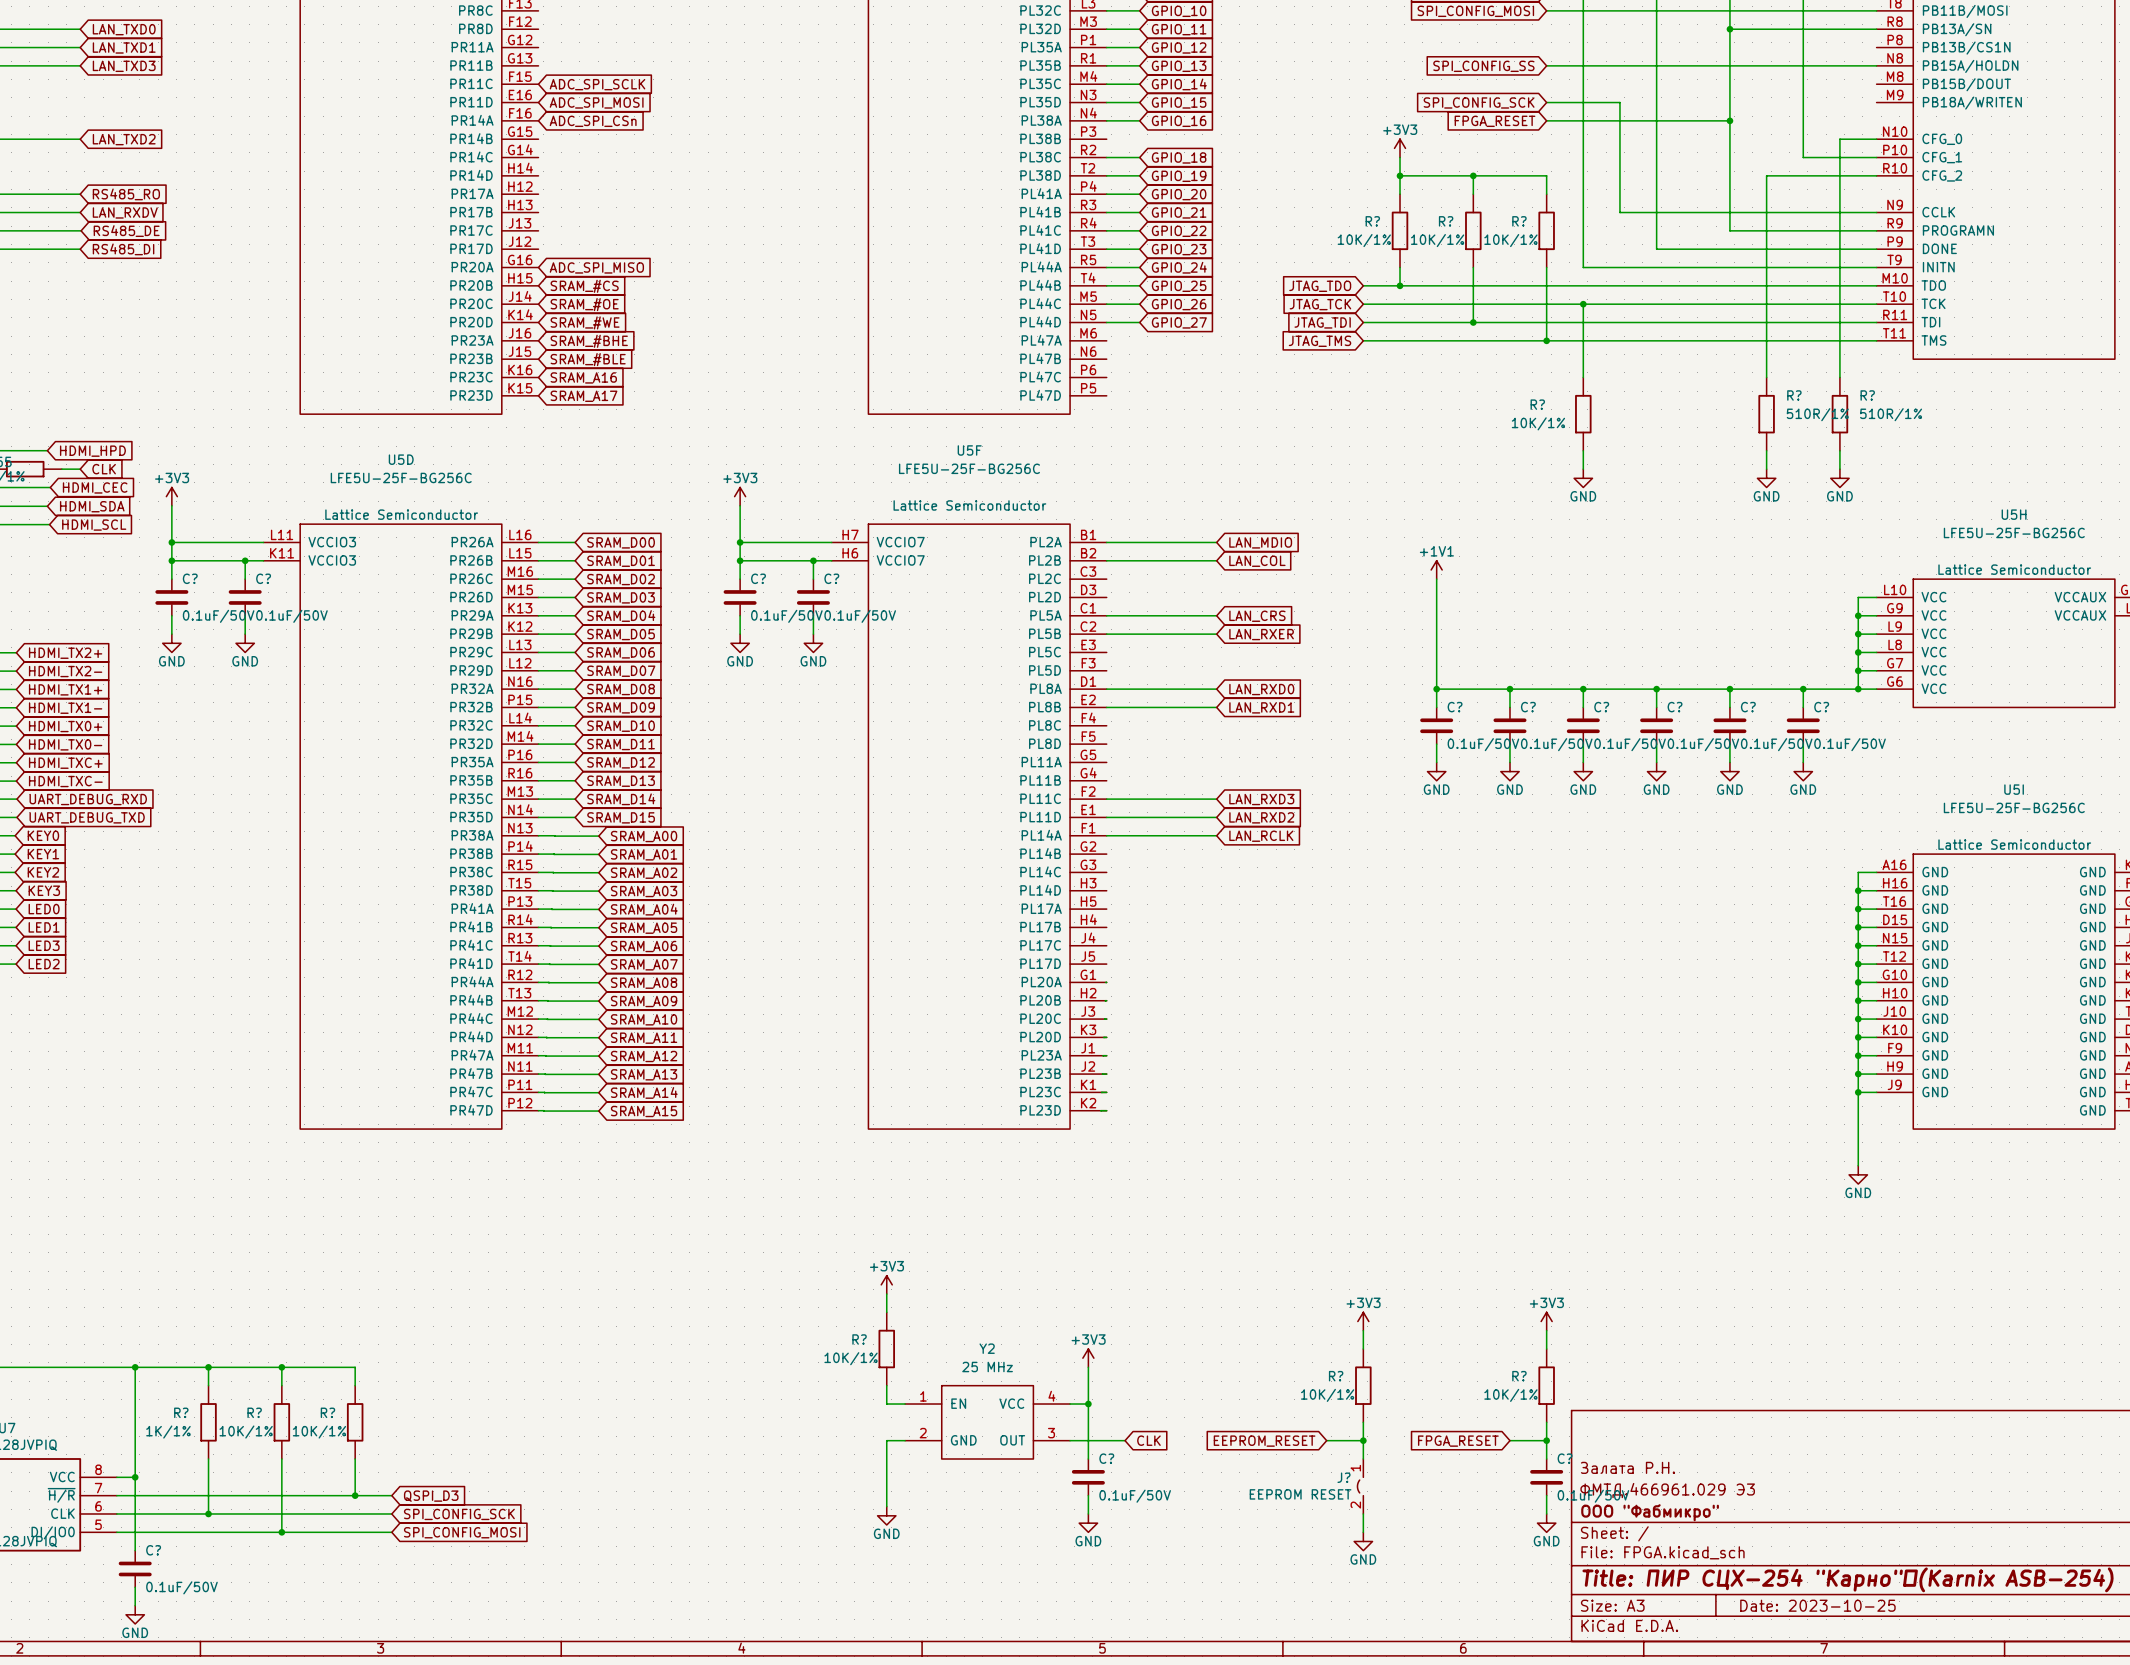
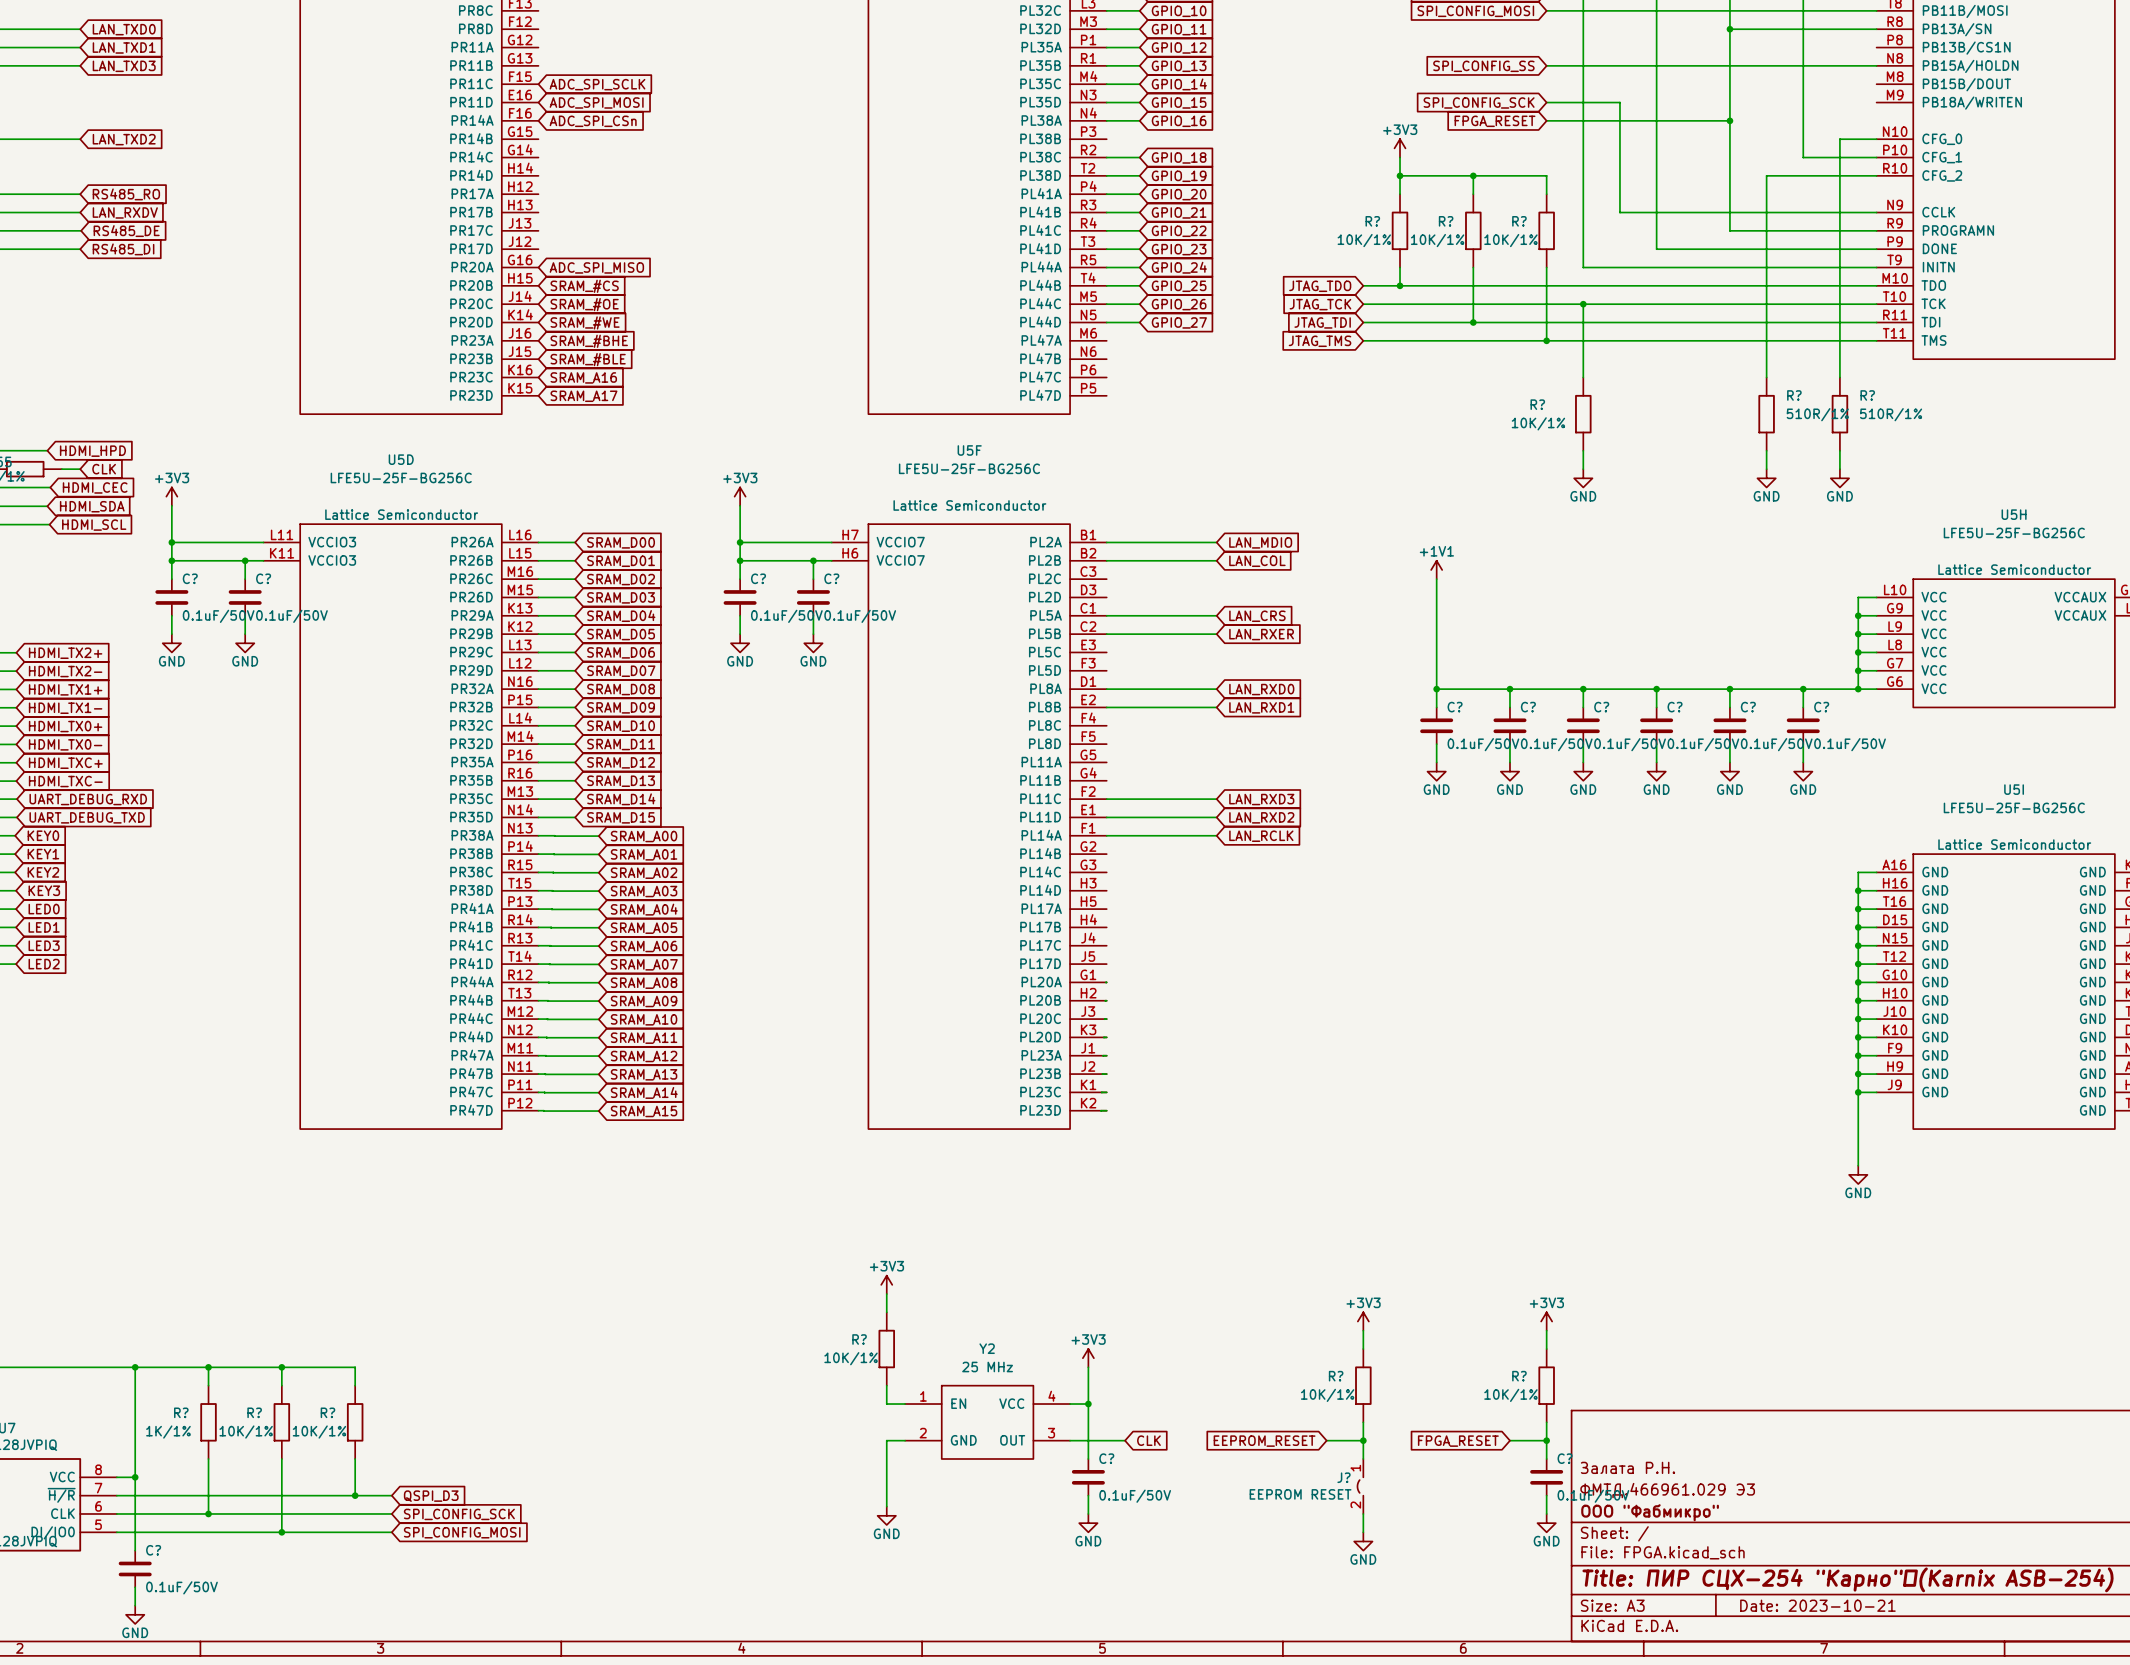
title block: Date: 2023-10-25 (1817, 1605) -> Date: 2023-10-21 (1817, 1605)

